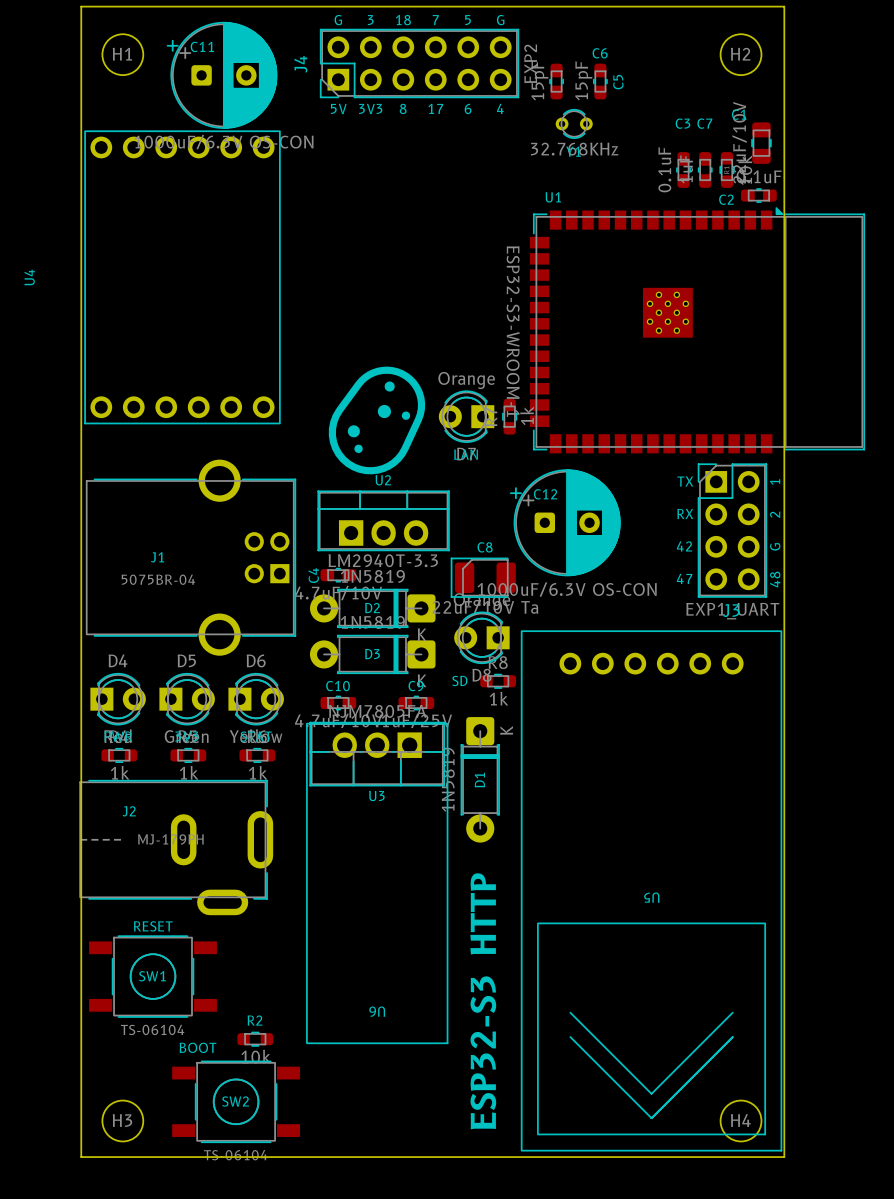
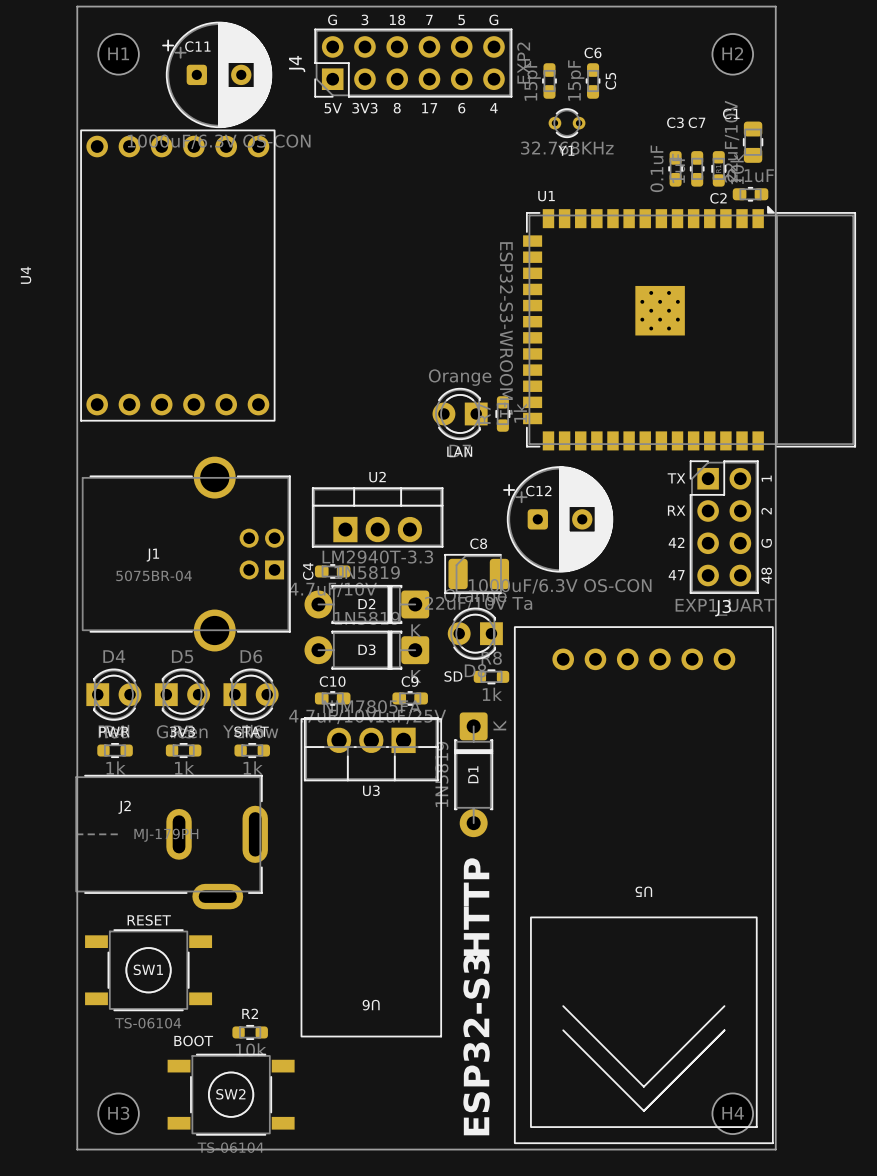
drawing: [328, 366, 426, 475] -> none

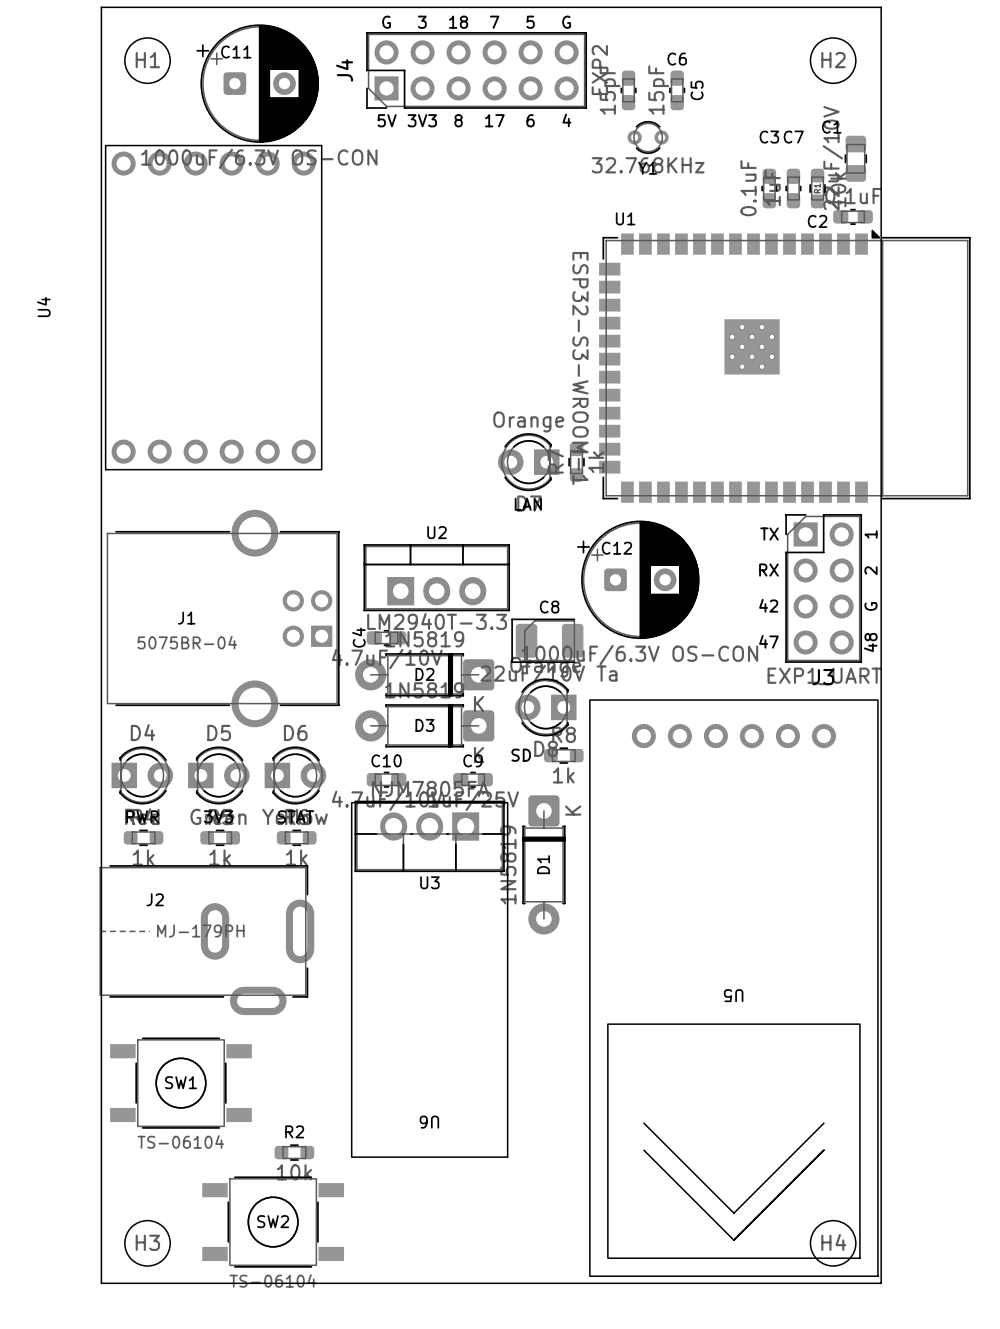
text: HTTP (476, 907) -> none
text: RESET (149, 920) -> none
text: BOOT (193, 1040) -> none
text: ESP32-S3 (476, 1044) -> none

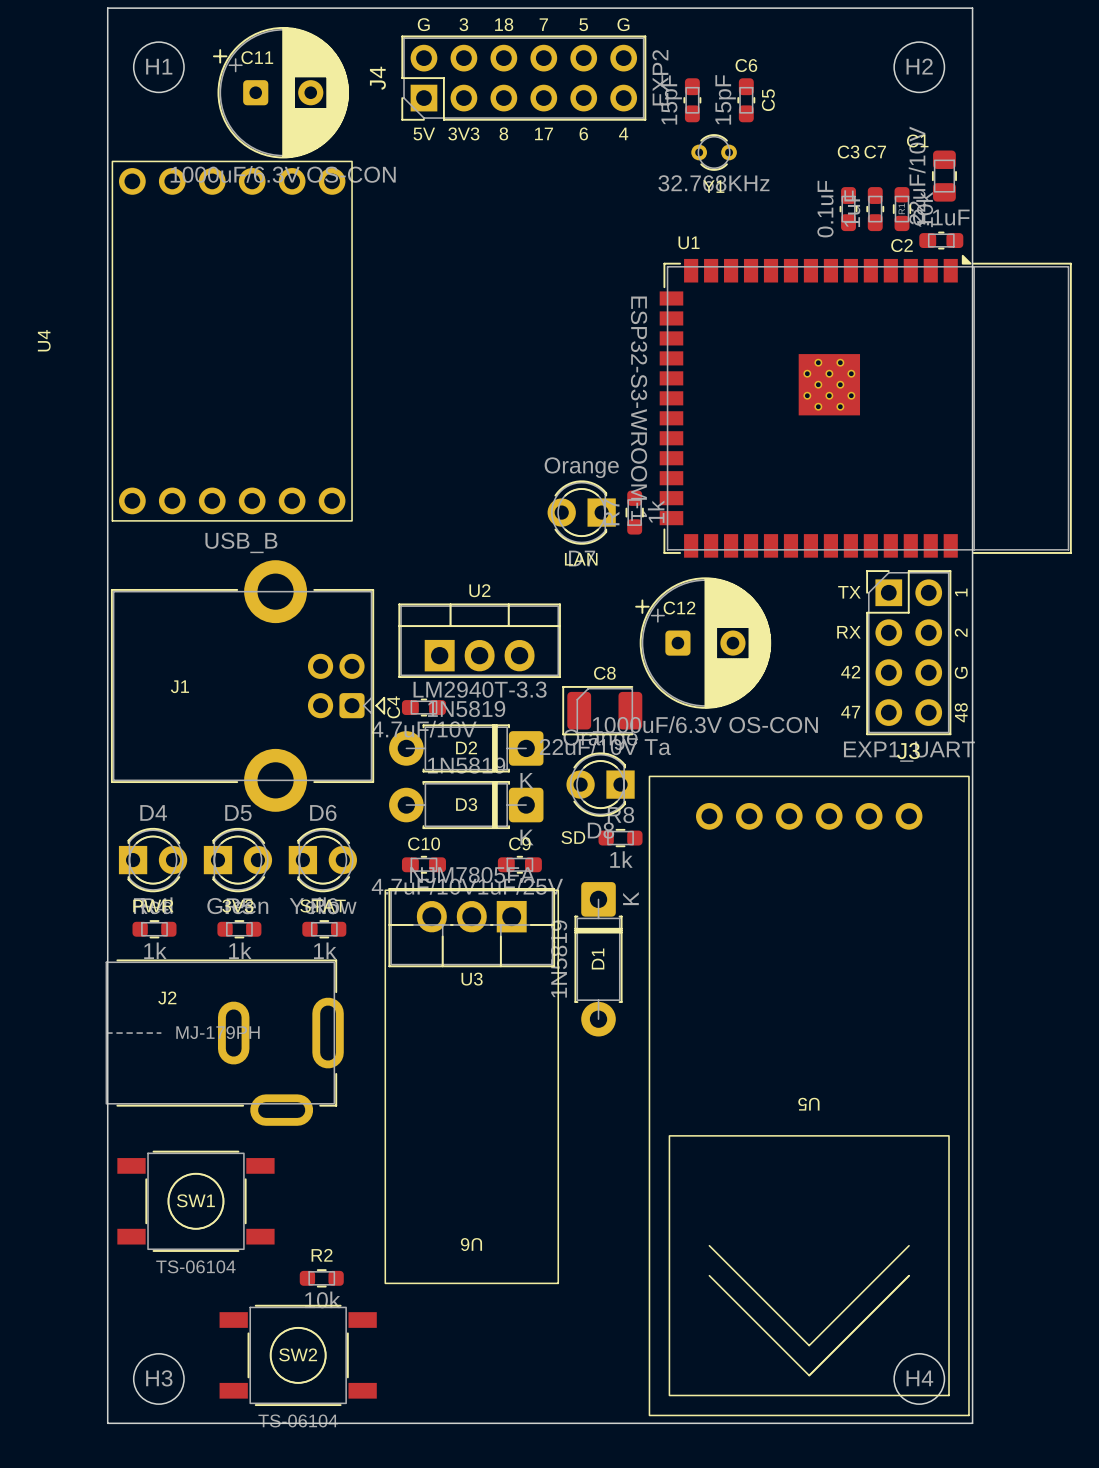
J1 footprint: [106, 509, 340, 728] -> [110, 560, 386, 812]
J1 value: 5075BR-04 (187, 642) -> USB_B (241, 542)

